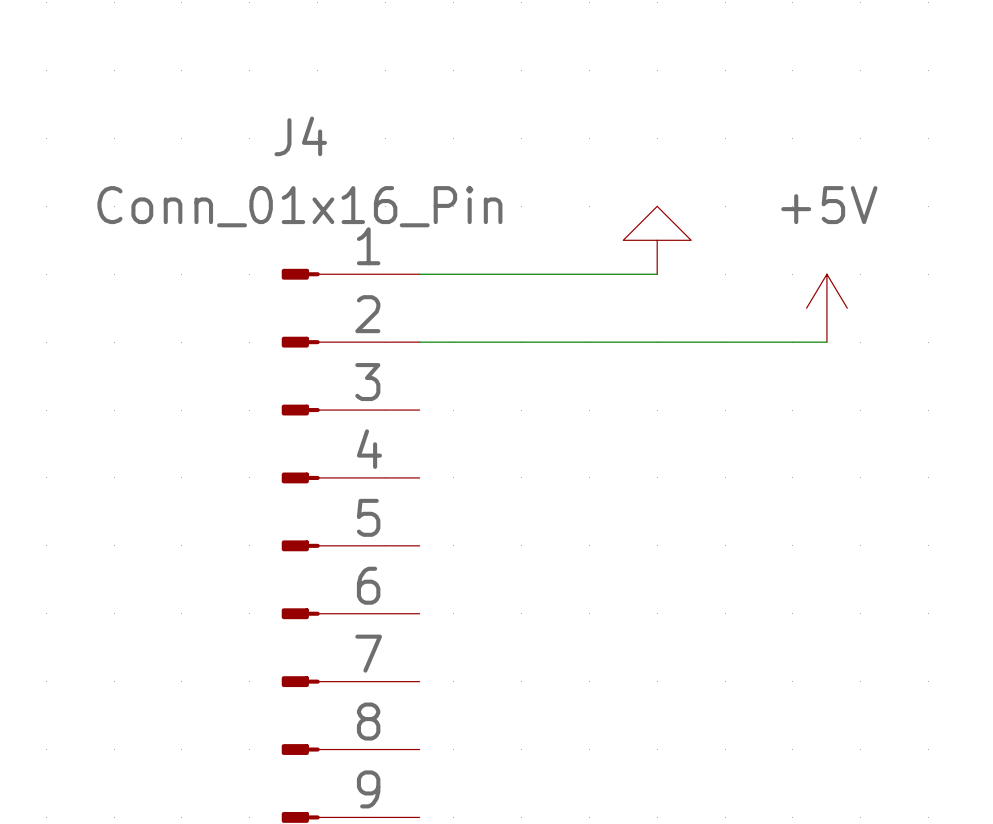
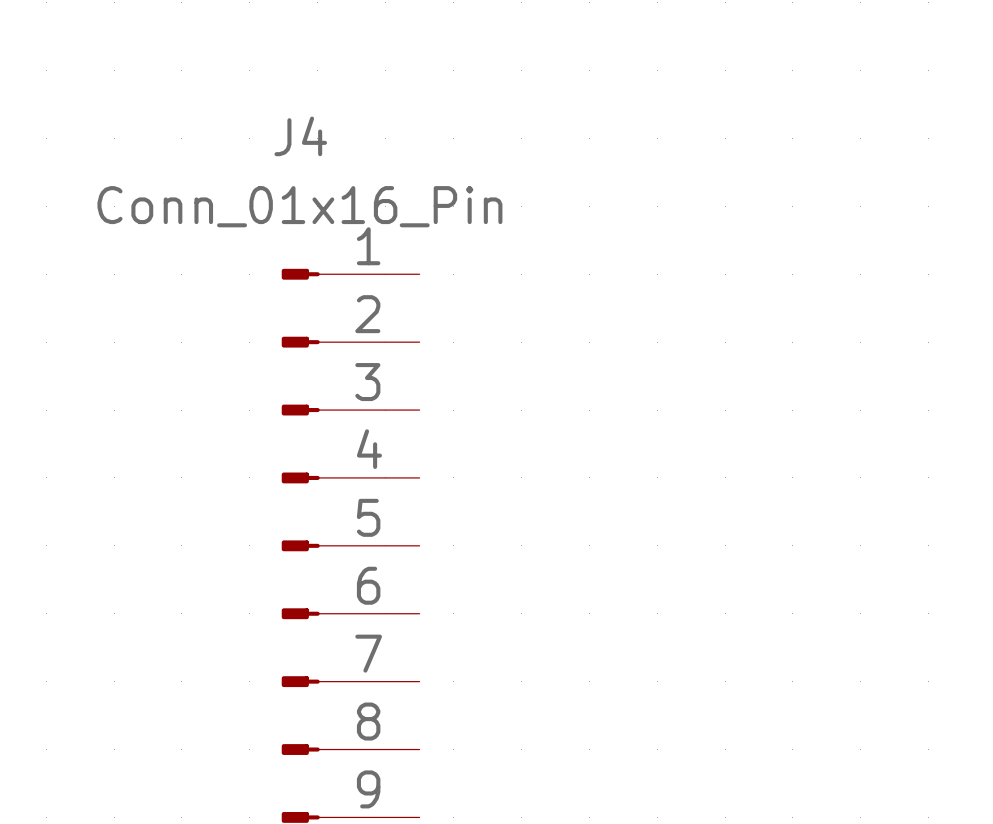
power symbol: (657, 240) -> none
wire: (419, 274) (657, 274) -> none
power symbol: +5V (826, 308) -> none
wire: (419, 342) (826, 342) -> none

